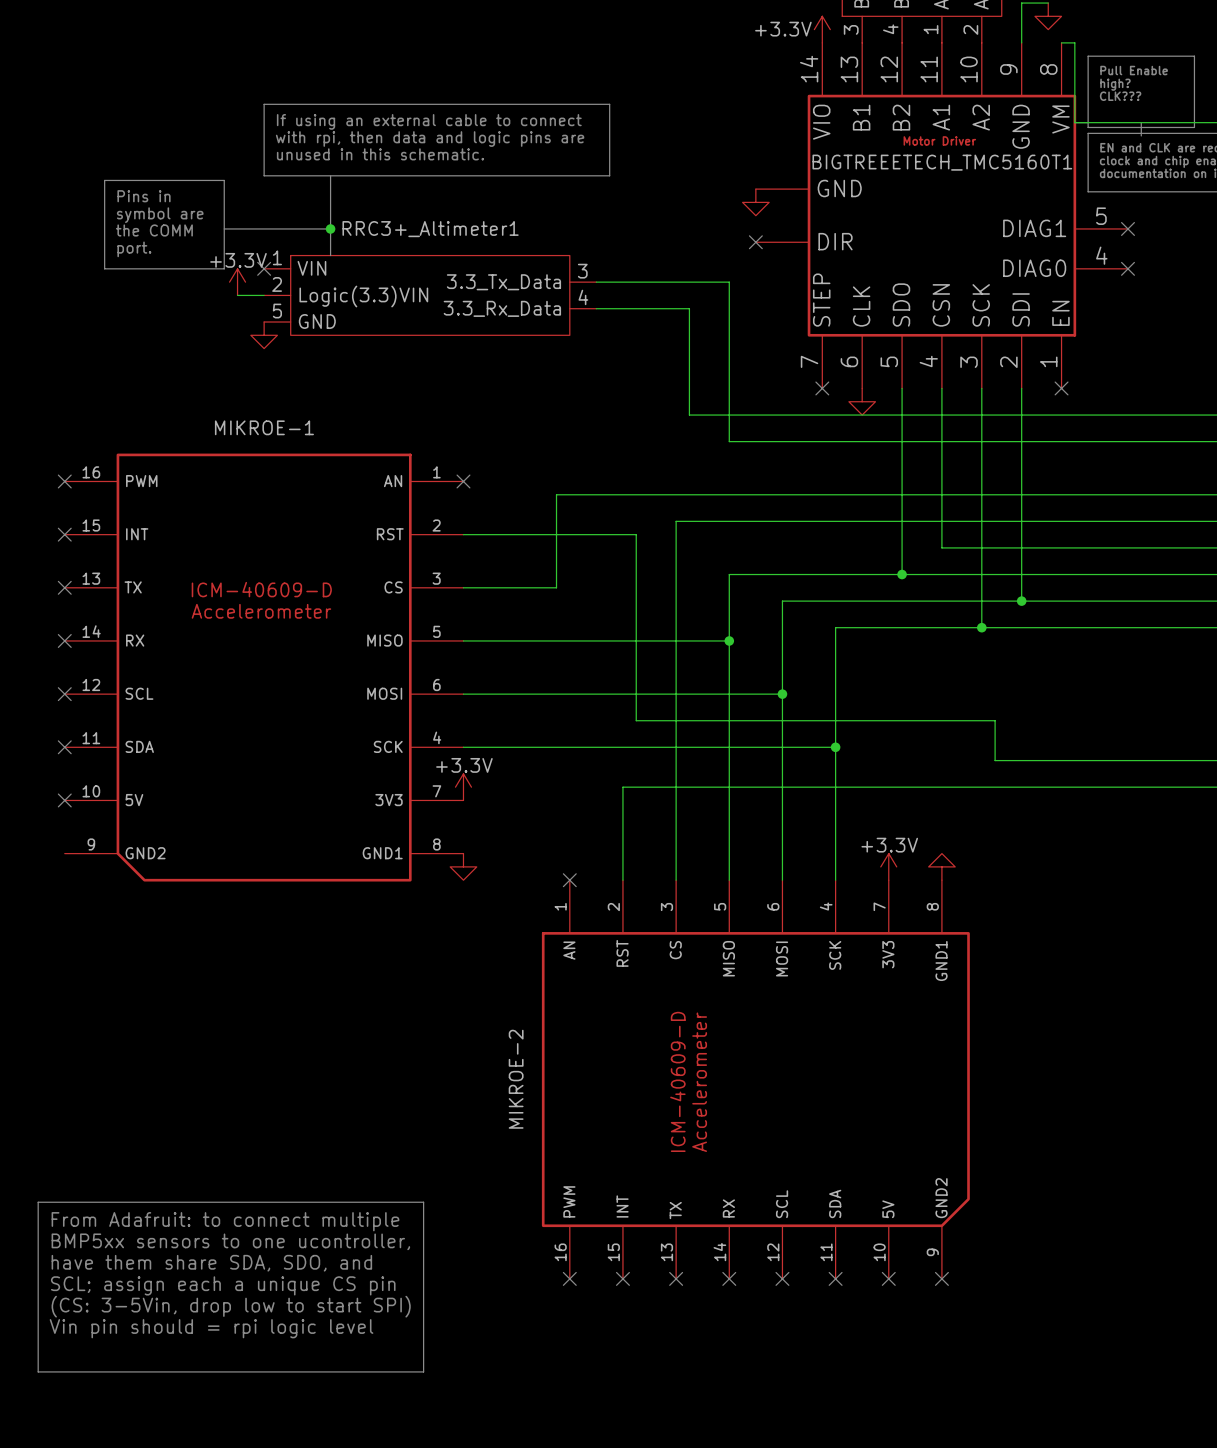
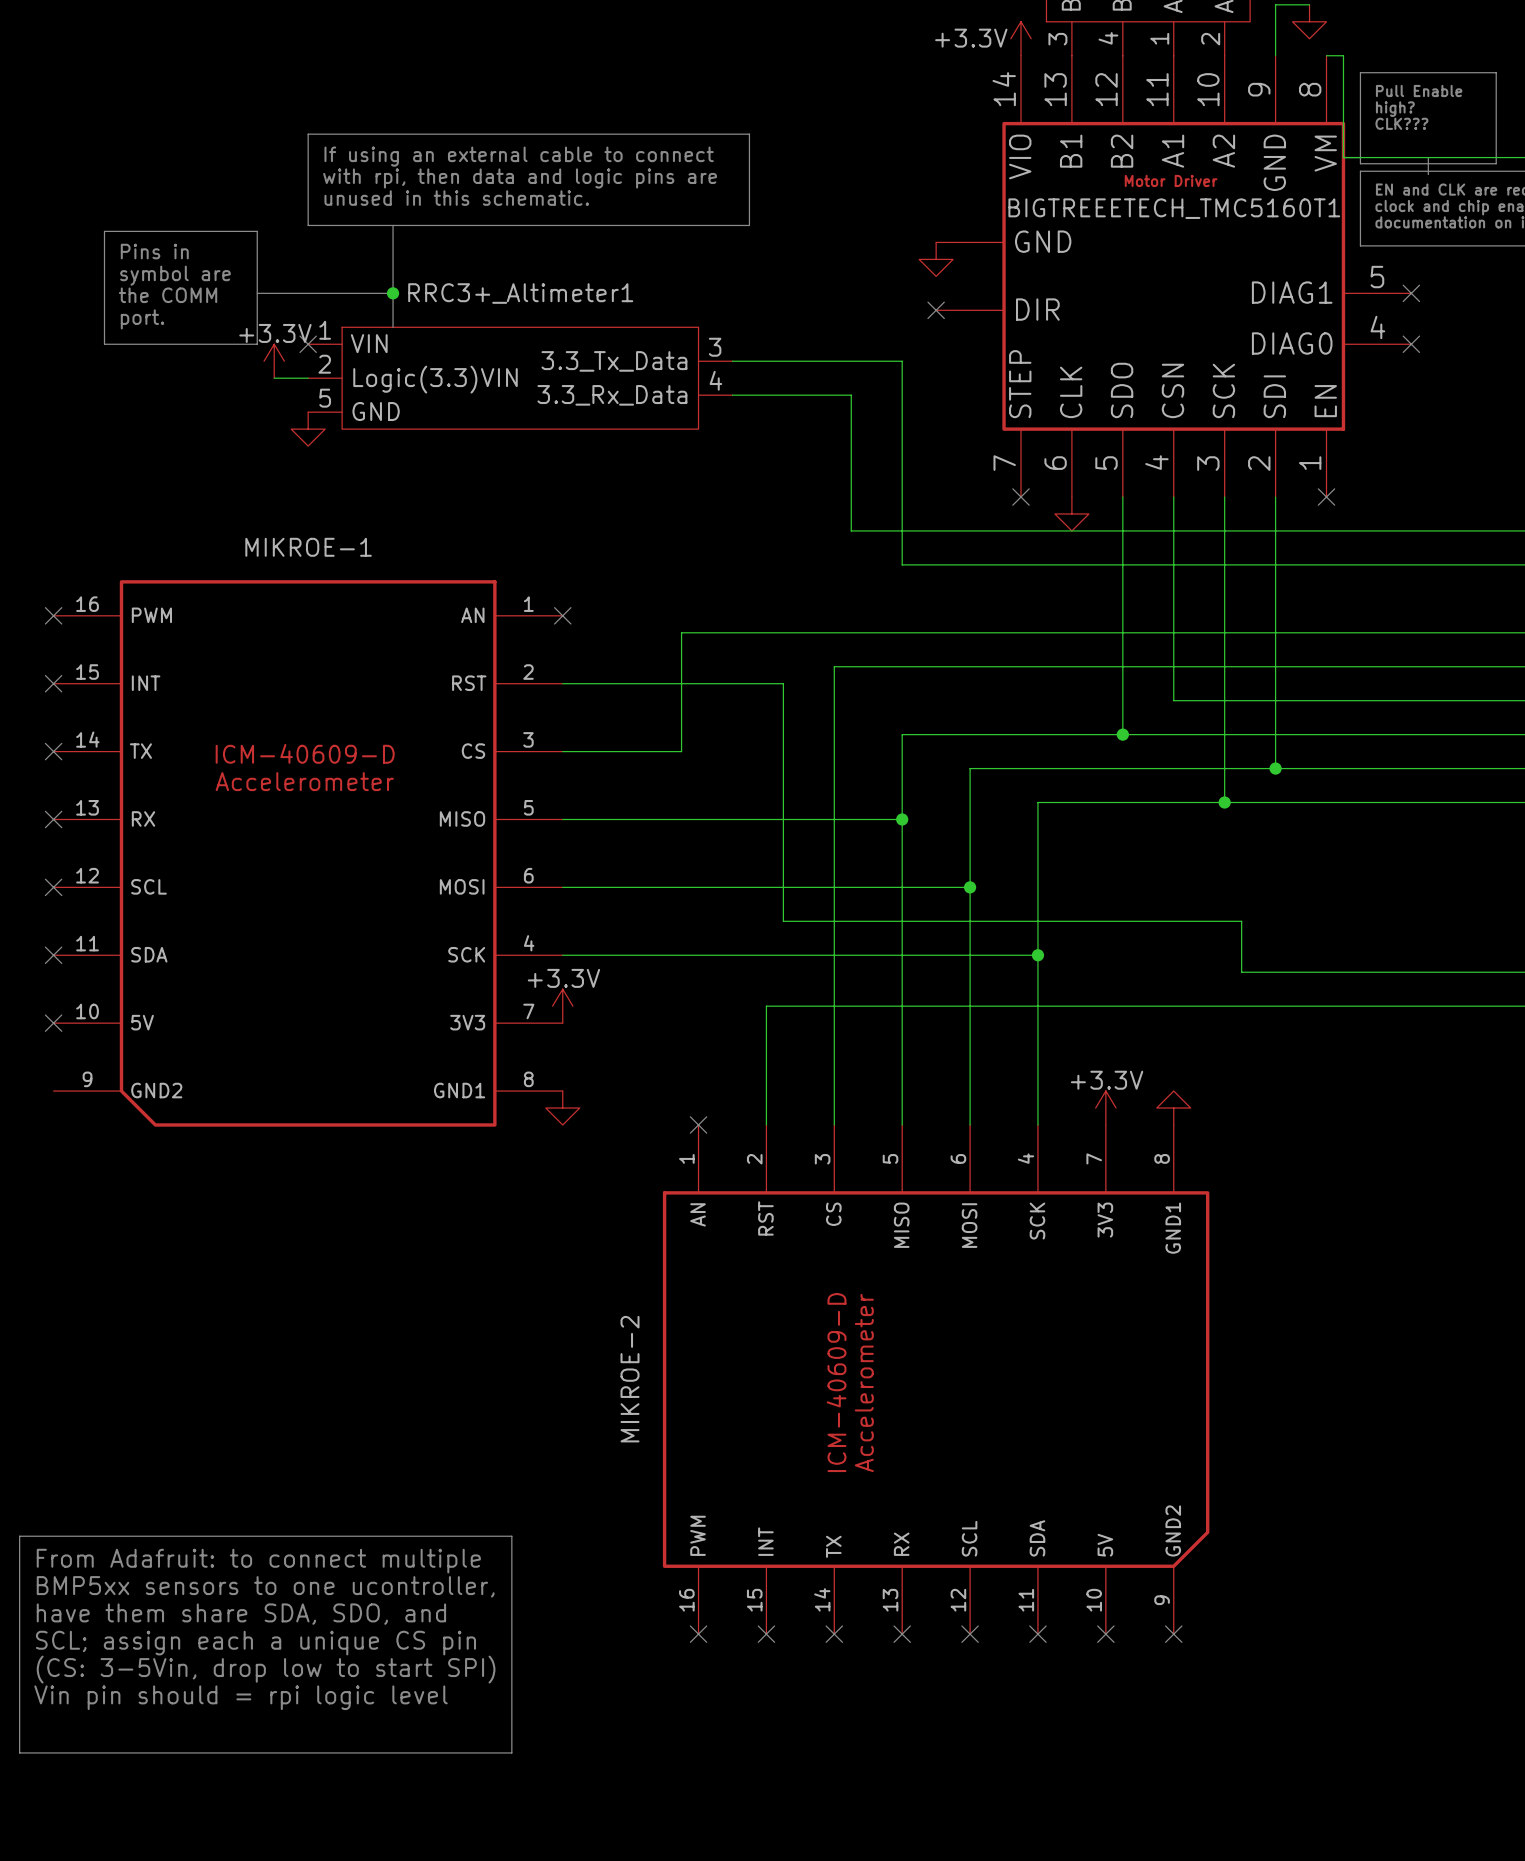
MIKROE-1 pin number: 13 (91, 578) -> 14 (87, 739)
MIKROE-1 pin number: 14 (91, 631) -> 13 (87, 807)
MIKROE-2 pin number: 13 (666, 1252) -> 14 (822, 1599)
MIKROE-2 pin number: 14 (719, 1252) -> 13 (890, 1600)

